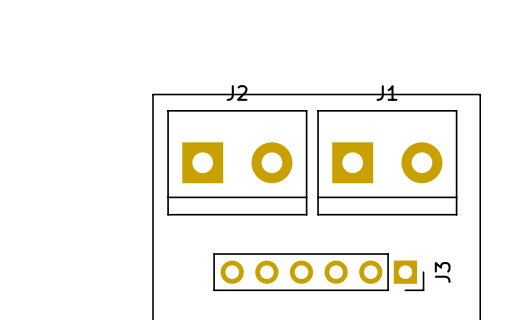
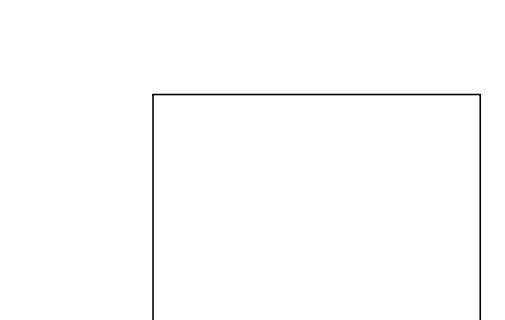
J2: (237, 162) -> none
J1: (387, 162) -> none
J3: (318, 272) -> none

